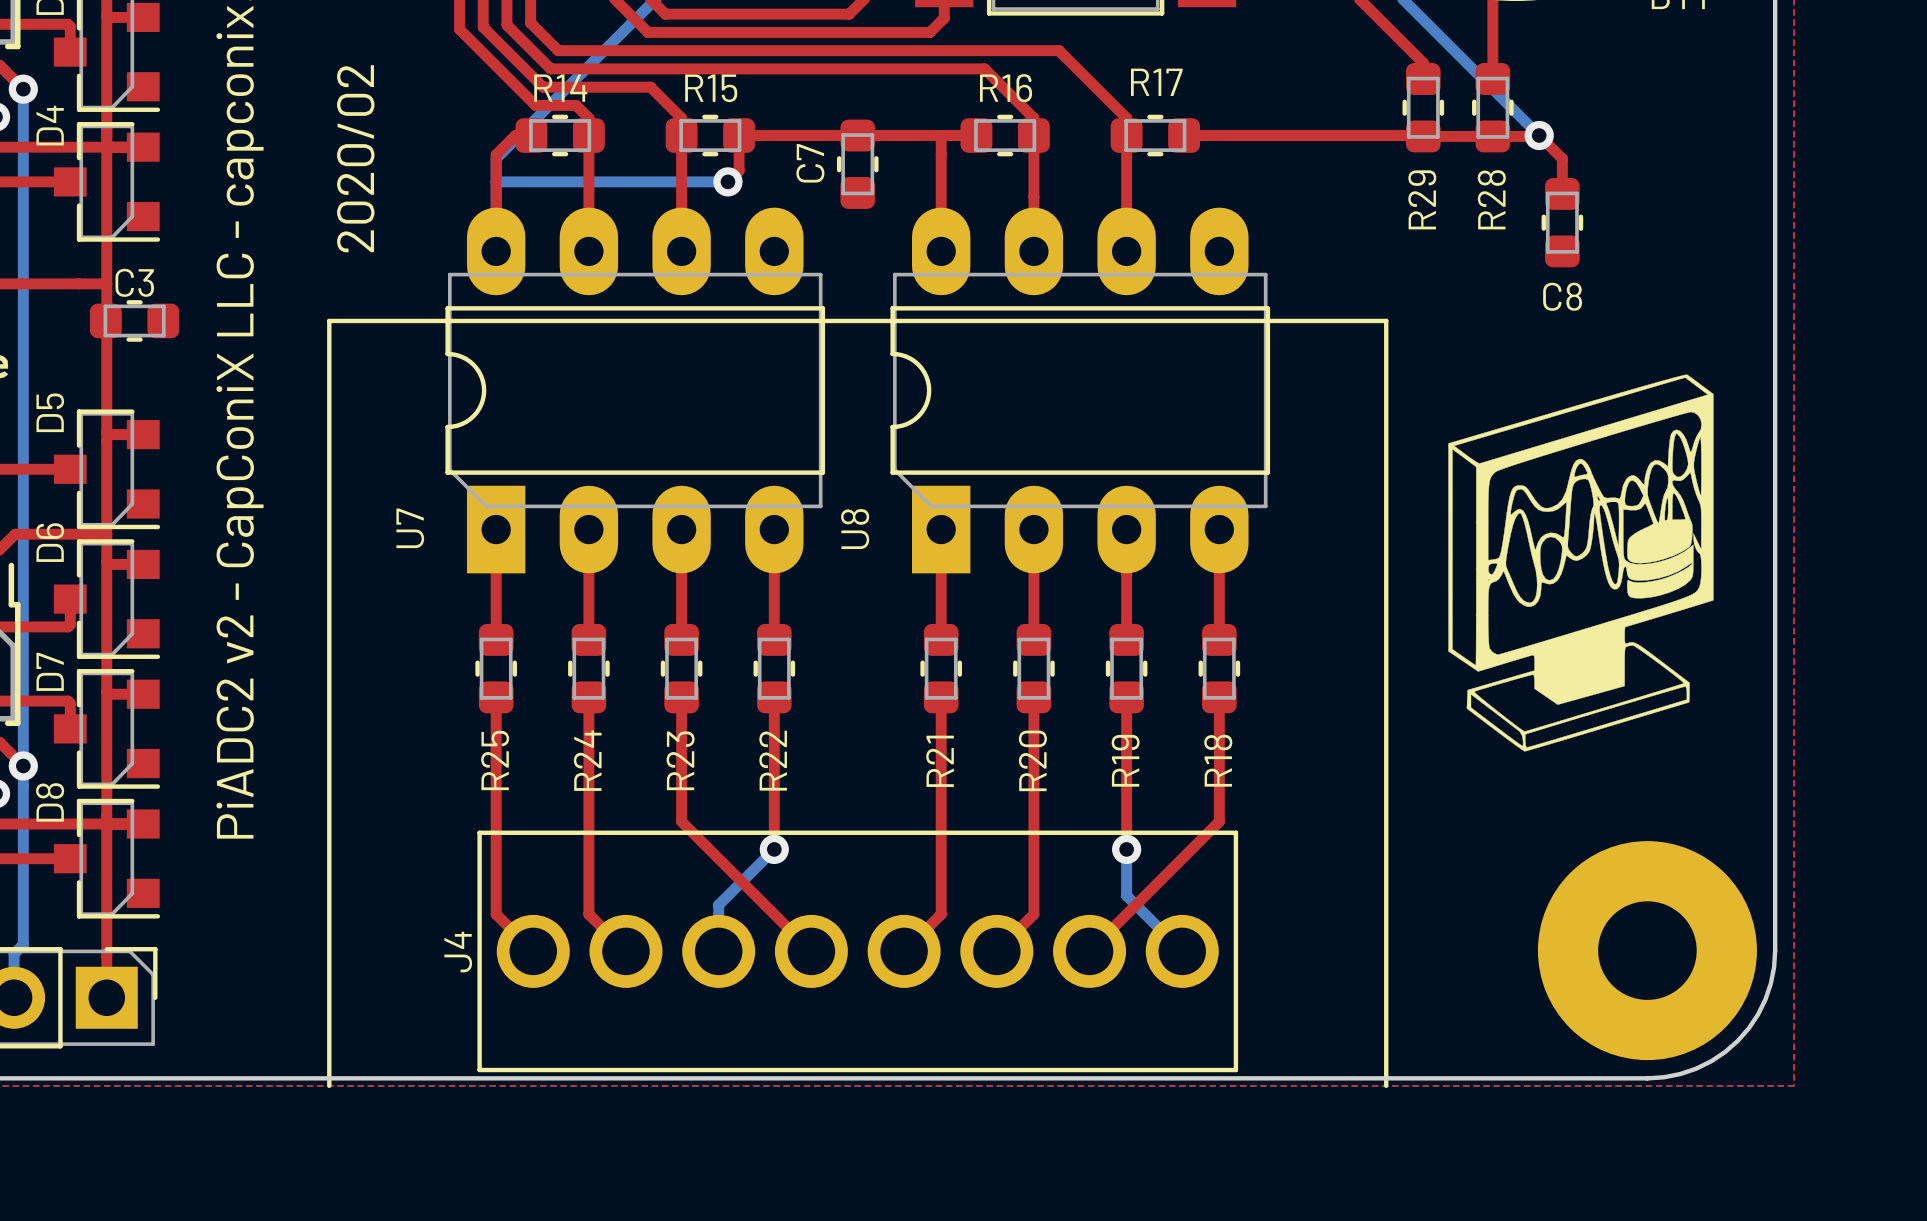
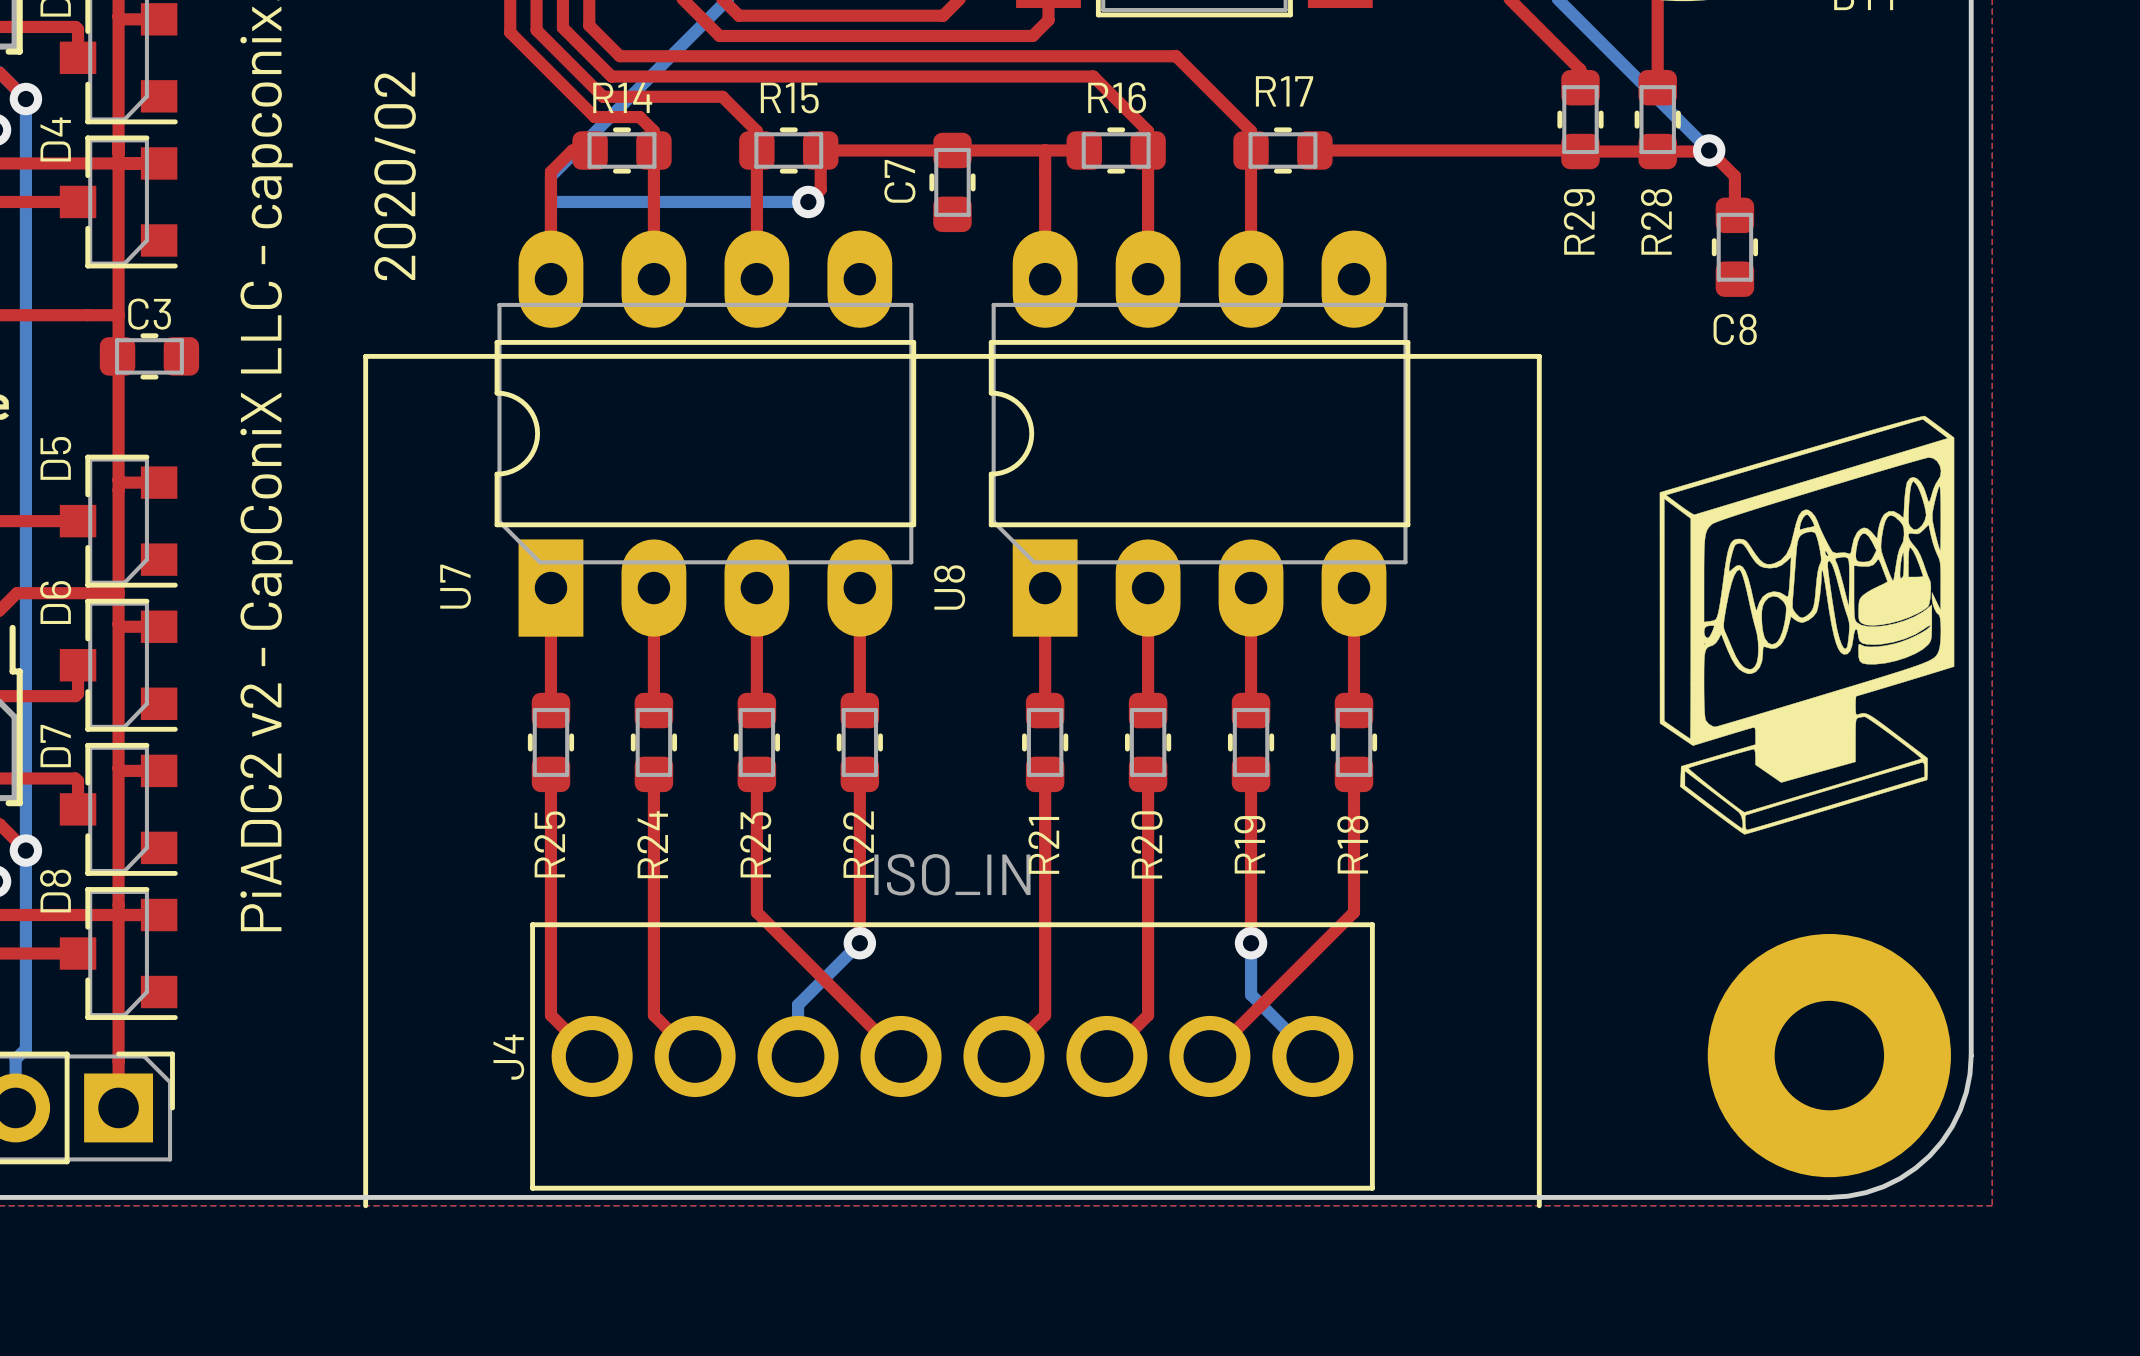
drawing position: (1580, 563) -> (1807, 625)
J4 value: none -> ISO_IN (952, 874)

